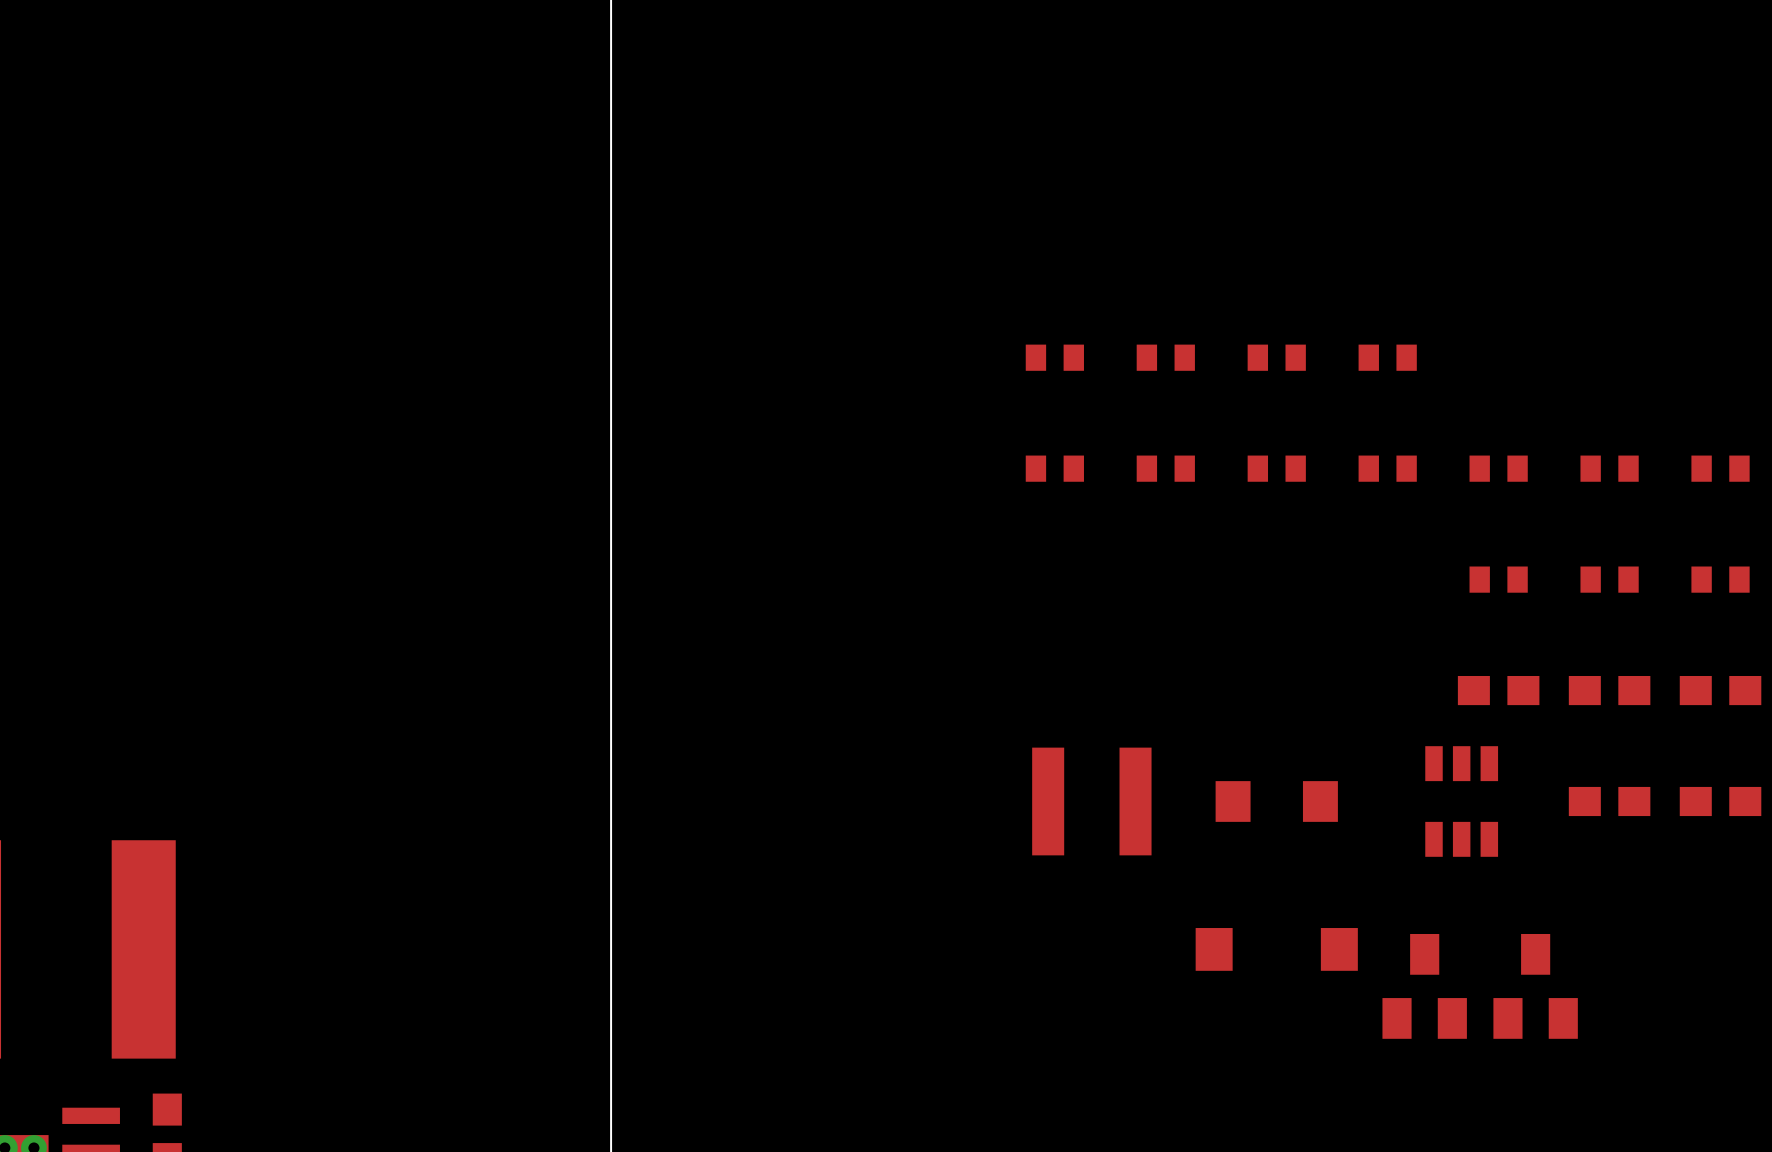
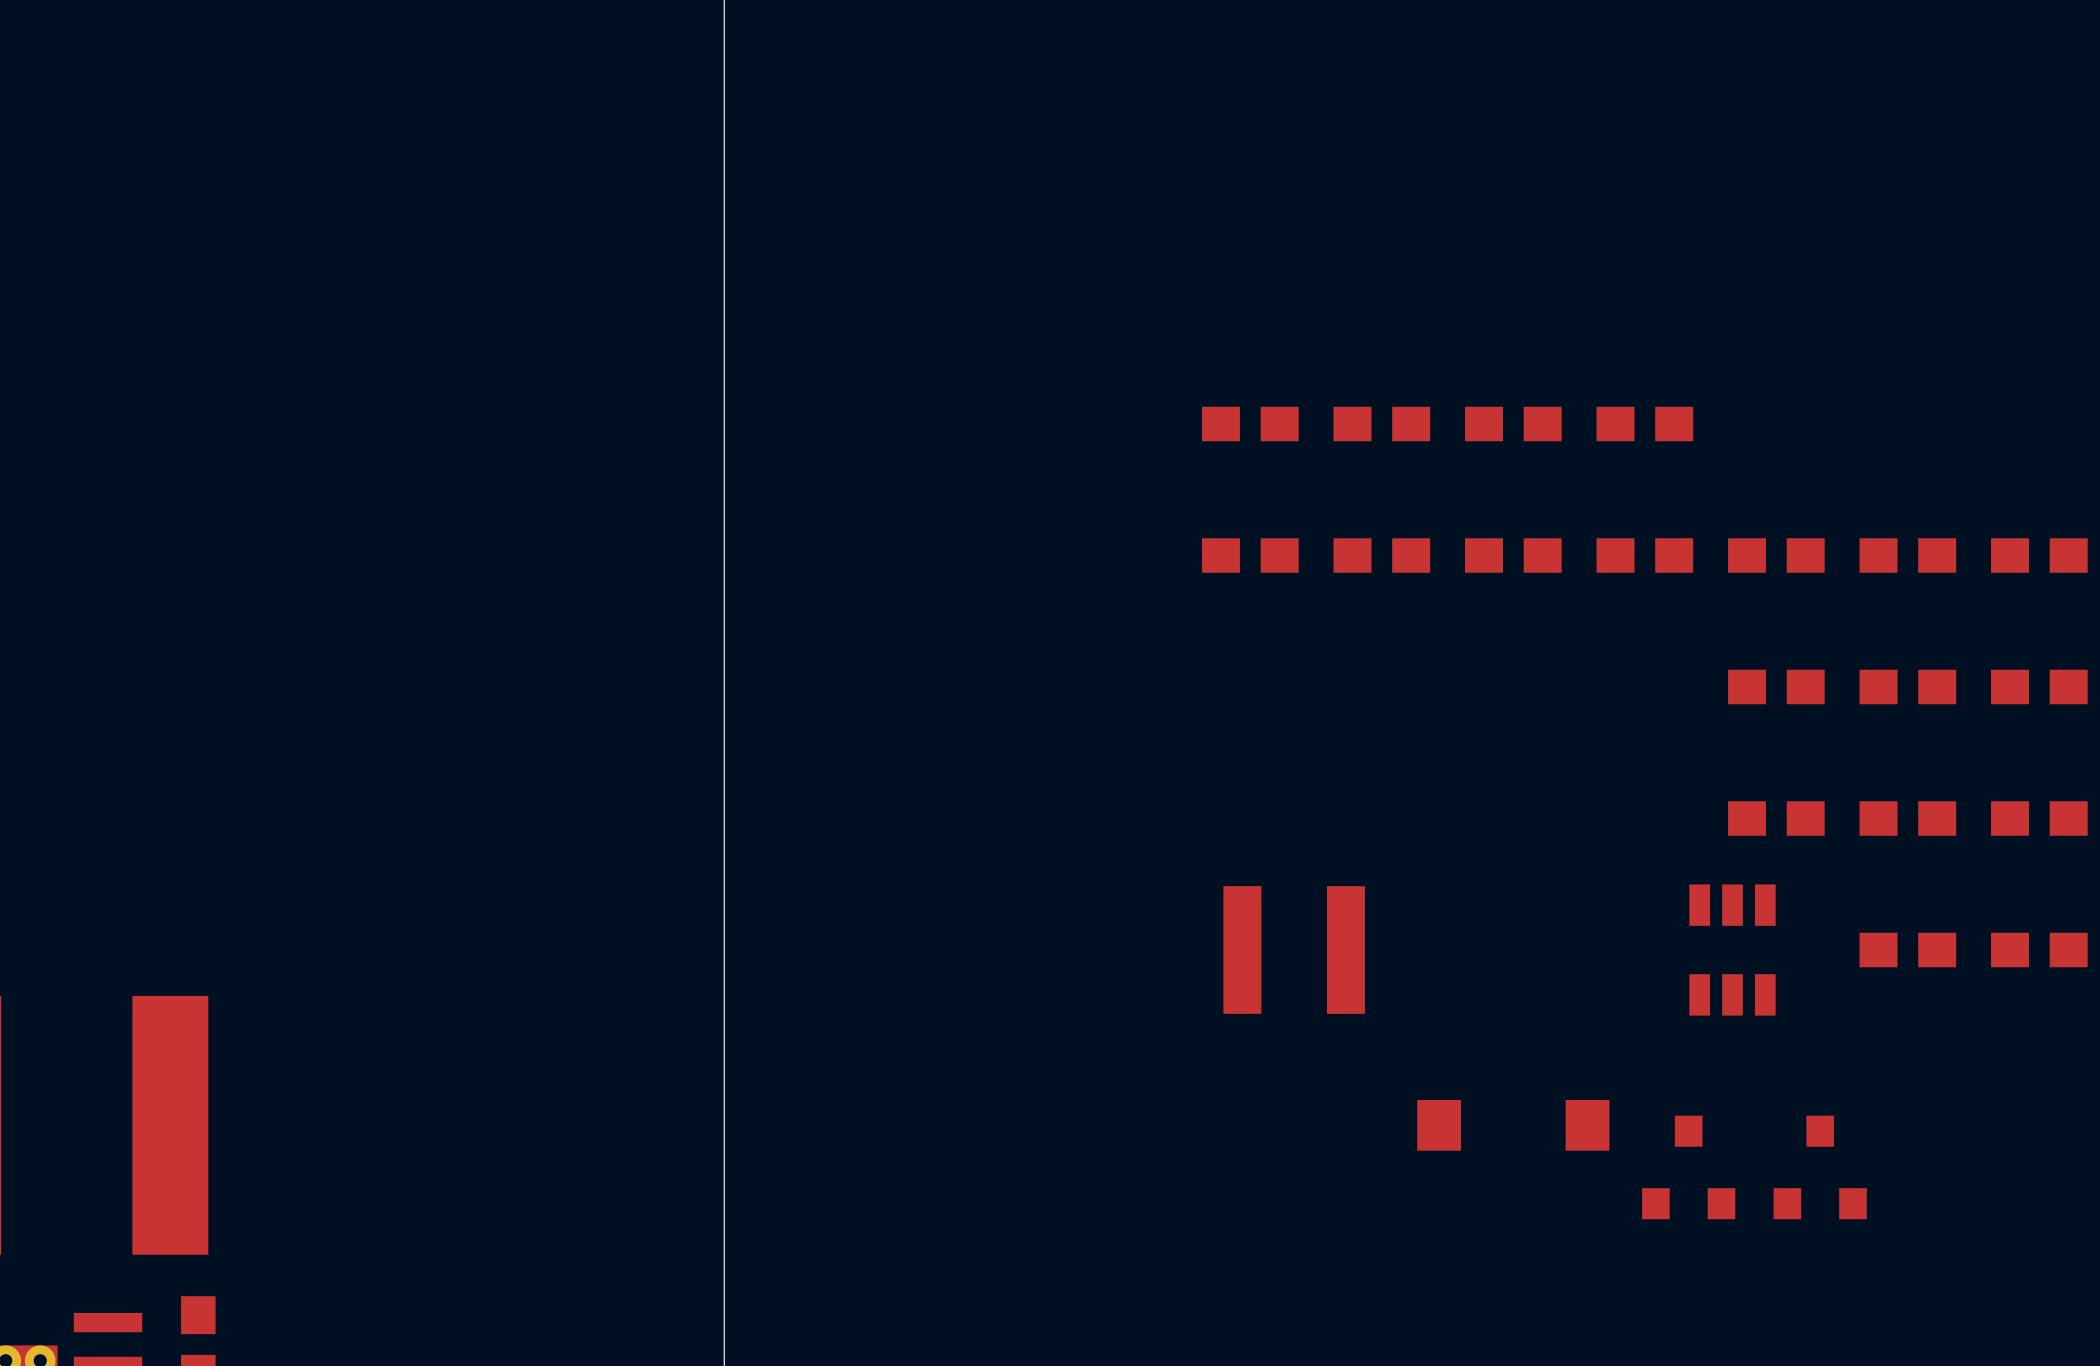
part footprint: [1025, 344, 1084, 371] -> [1202, 406, 1299, 442]
part footprint: [1136, 344, 1195, 371] -> [1333, 406, 1431, 442]
part footprint: [1247, 344, 1306, 371] -> [1465, 406, 1562, 442]
part footprint: [1358, 344, 1417, 371] -> [1596, 406, 1694, 442]
part footprint: [1025, 455, 1084, 482] -> [1202, 538, 1299, 573]
part footprint: [1136, 455, 1195, 482] -> [1333, 538, 1431, 573]
part footprint: [1247, 455, 1306, 482] -> [1465, 538, 1562, 573]
part footprint: [1358, 455, 1417, 482] -> [1596, 538, 1694, 573]
part footprint: [1469, 455, 1528, 482] -> [1728, 538, 1825, 573]
part footprint: [1580, 455, 1639, 482] -> [1859, 538, 1957, 573]
part footprint: [1691, 455, 1750, 482] -> [1991, 538, 2088, 573]
part footprint: [1469, 566, 1528, 593] -> [1728, 669, 1825, 705]
part footprint: [1580, 566, 1639, 593] -> [1859, 669, 1957, 705]
part footprint: [1691, 566, 1750, 593] -> [1991, 669, 2088, 705]
part: (1276, 801) -> none
part footprint: [1382, 933, 1467, 1039] -> [1642, 1115, 1736, 1220]
part footprint: [1493, 933, 1578, 1039] -> [1773, 1115, 1867, 1220]

